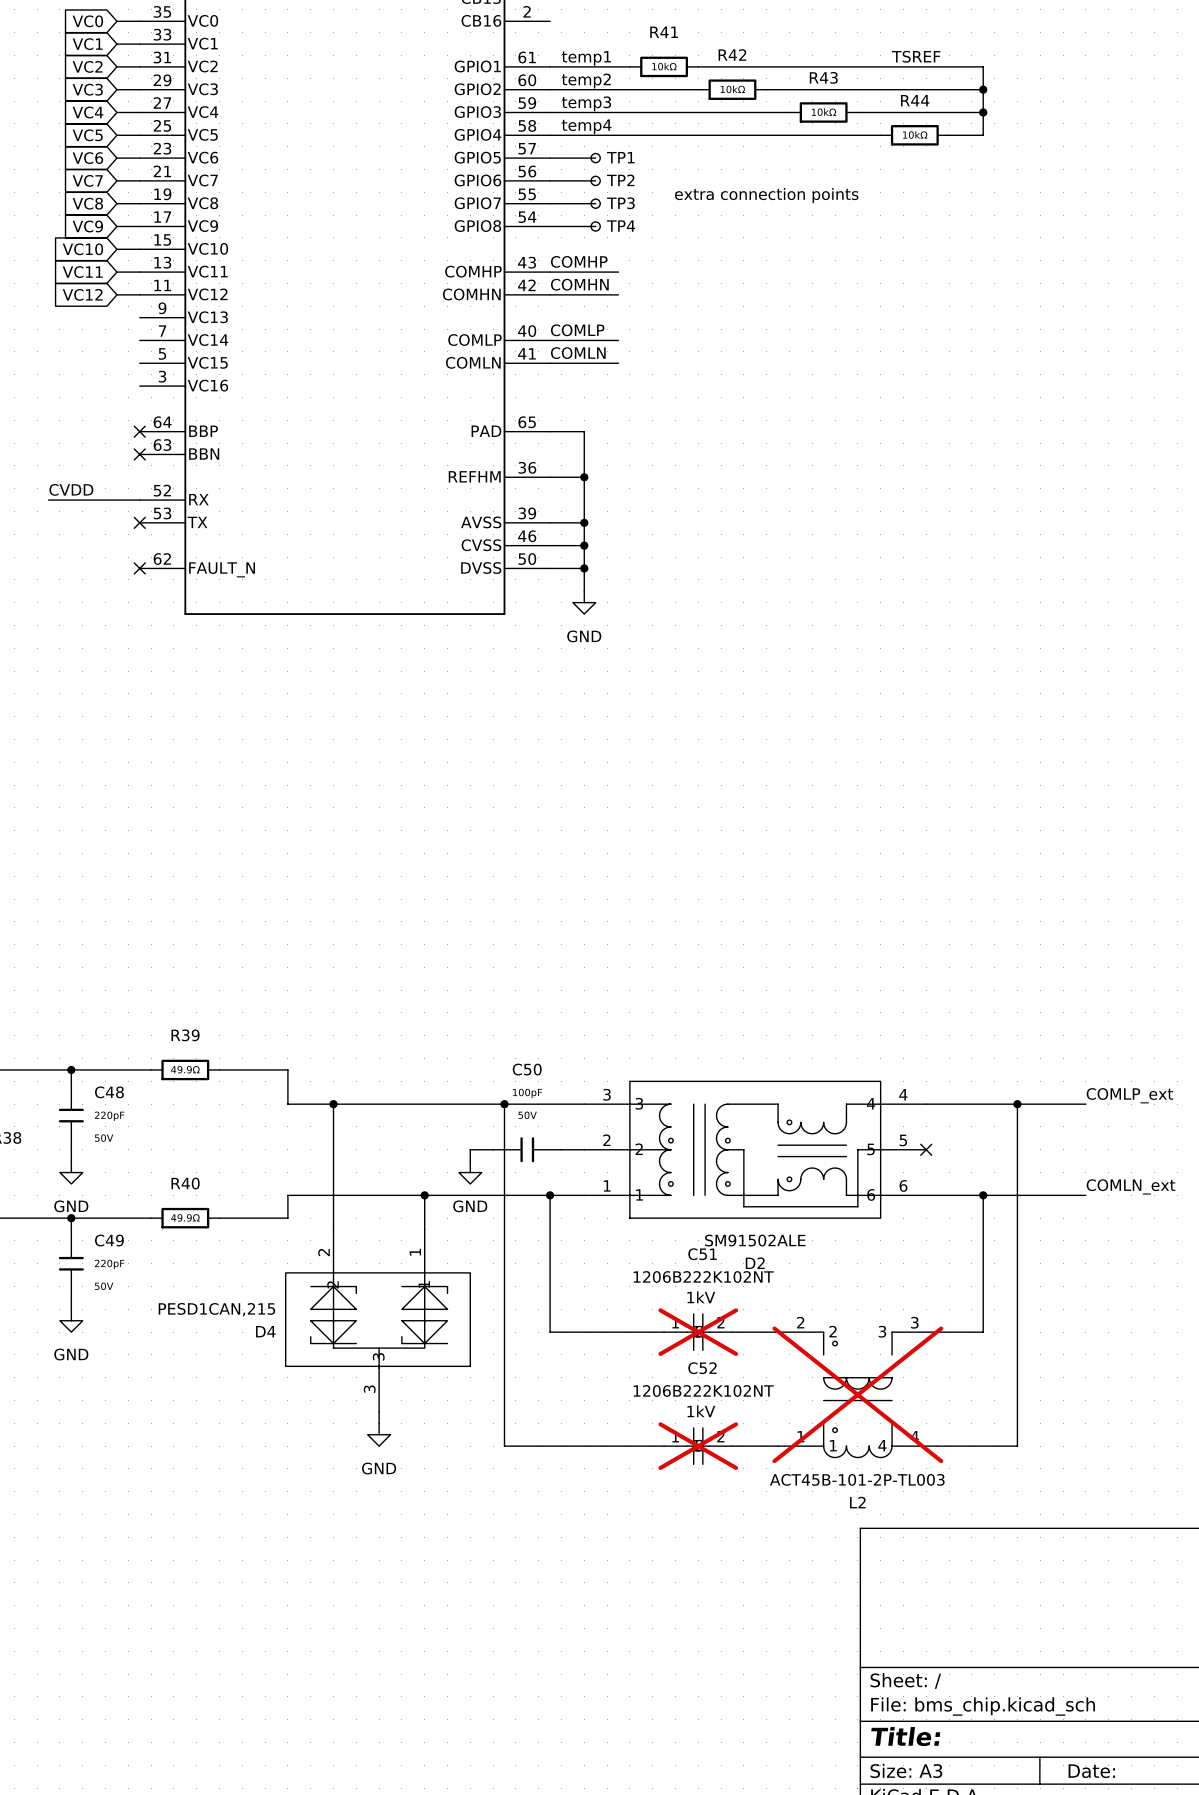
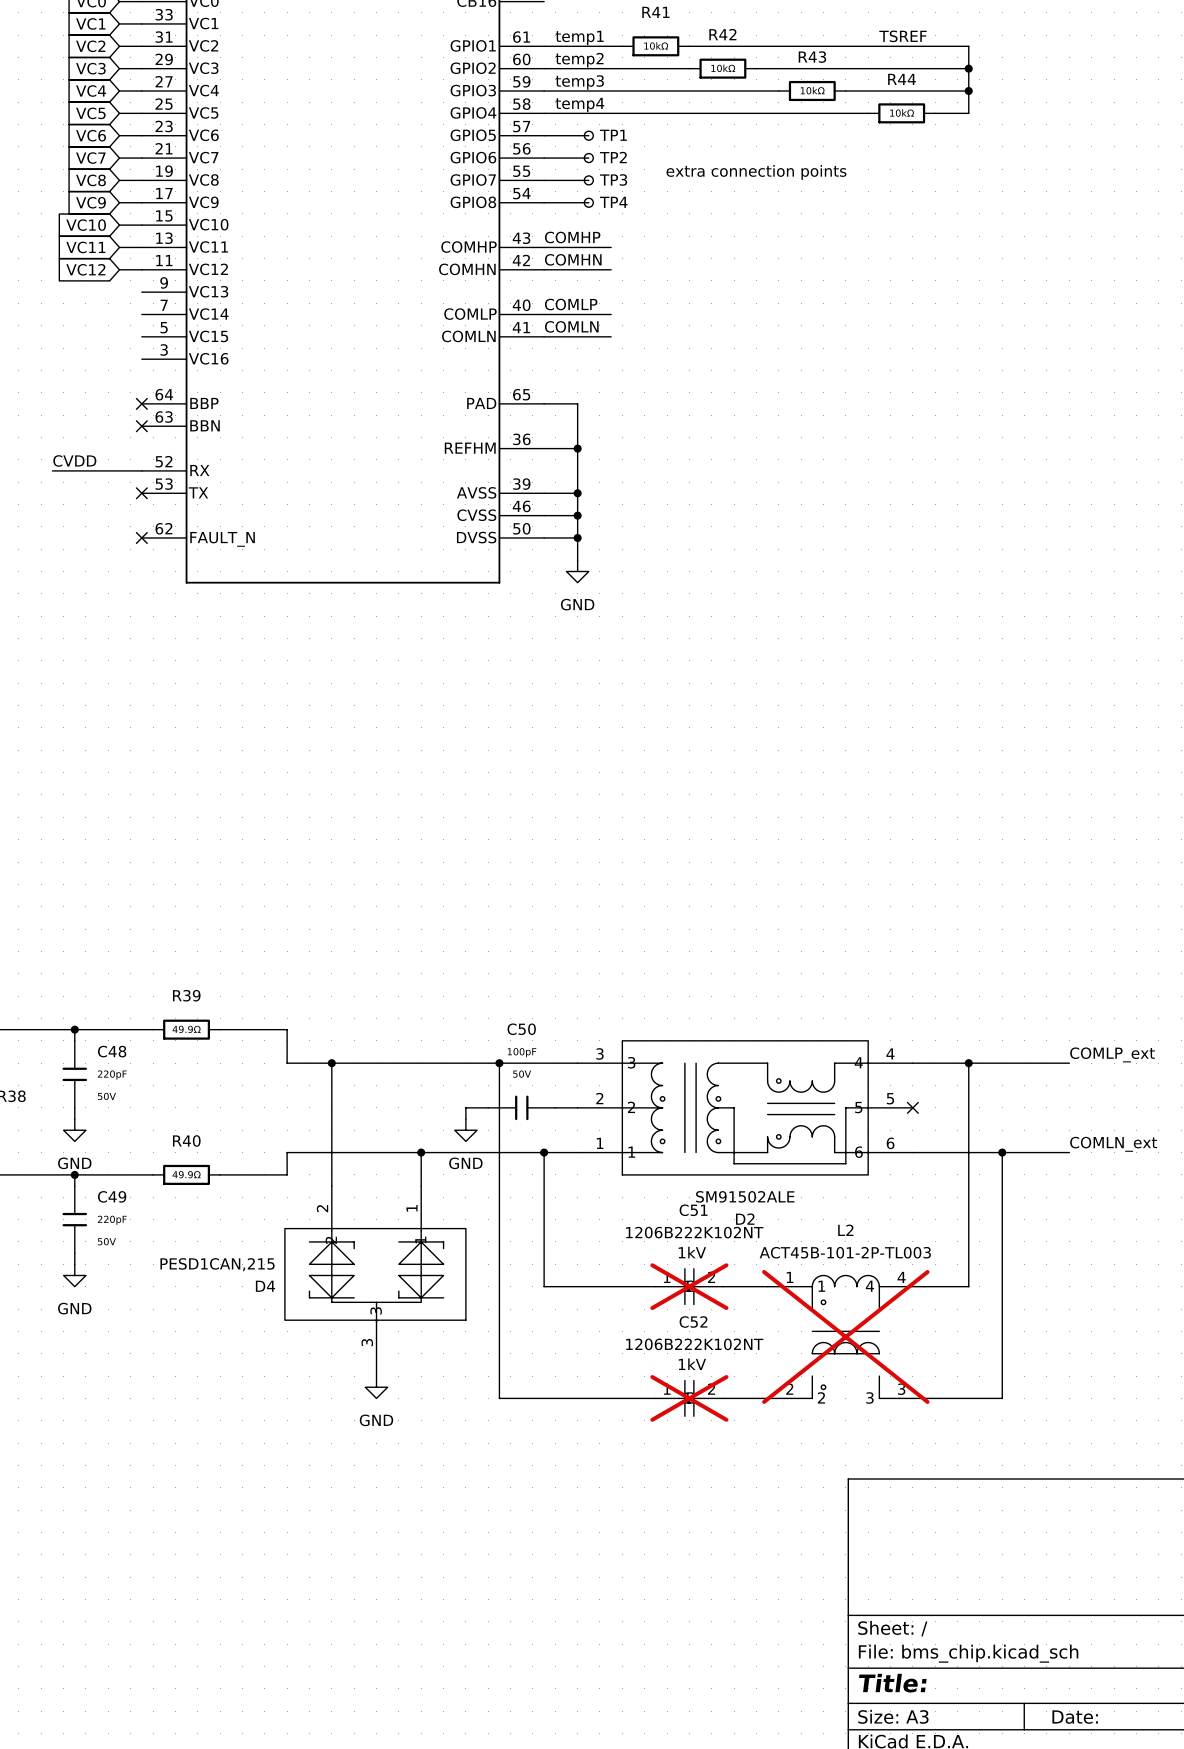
wire: (1017, 1104) (1017, 1195) -> (968, 1063) (968, 1152)
junction position: (1017, 1104) -> (968, 1063)
junction position: (983, 1195) -> (1002, 1152)
L2 flip: as is (857, 1394) -> up-down (845, 1336)

